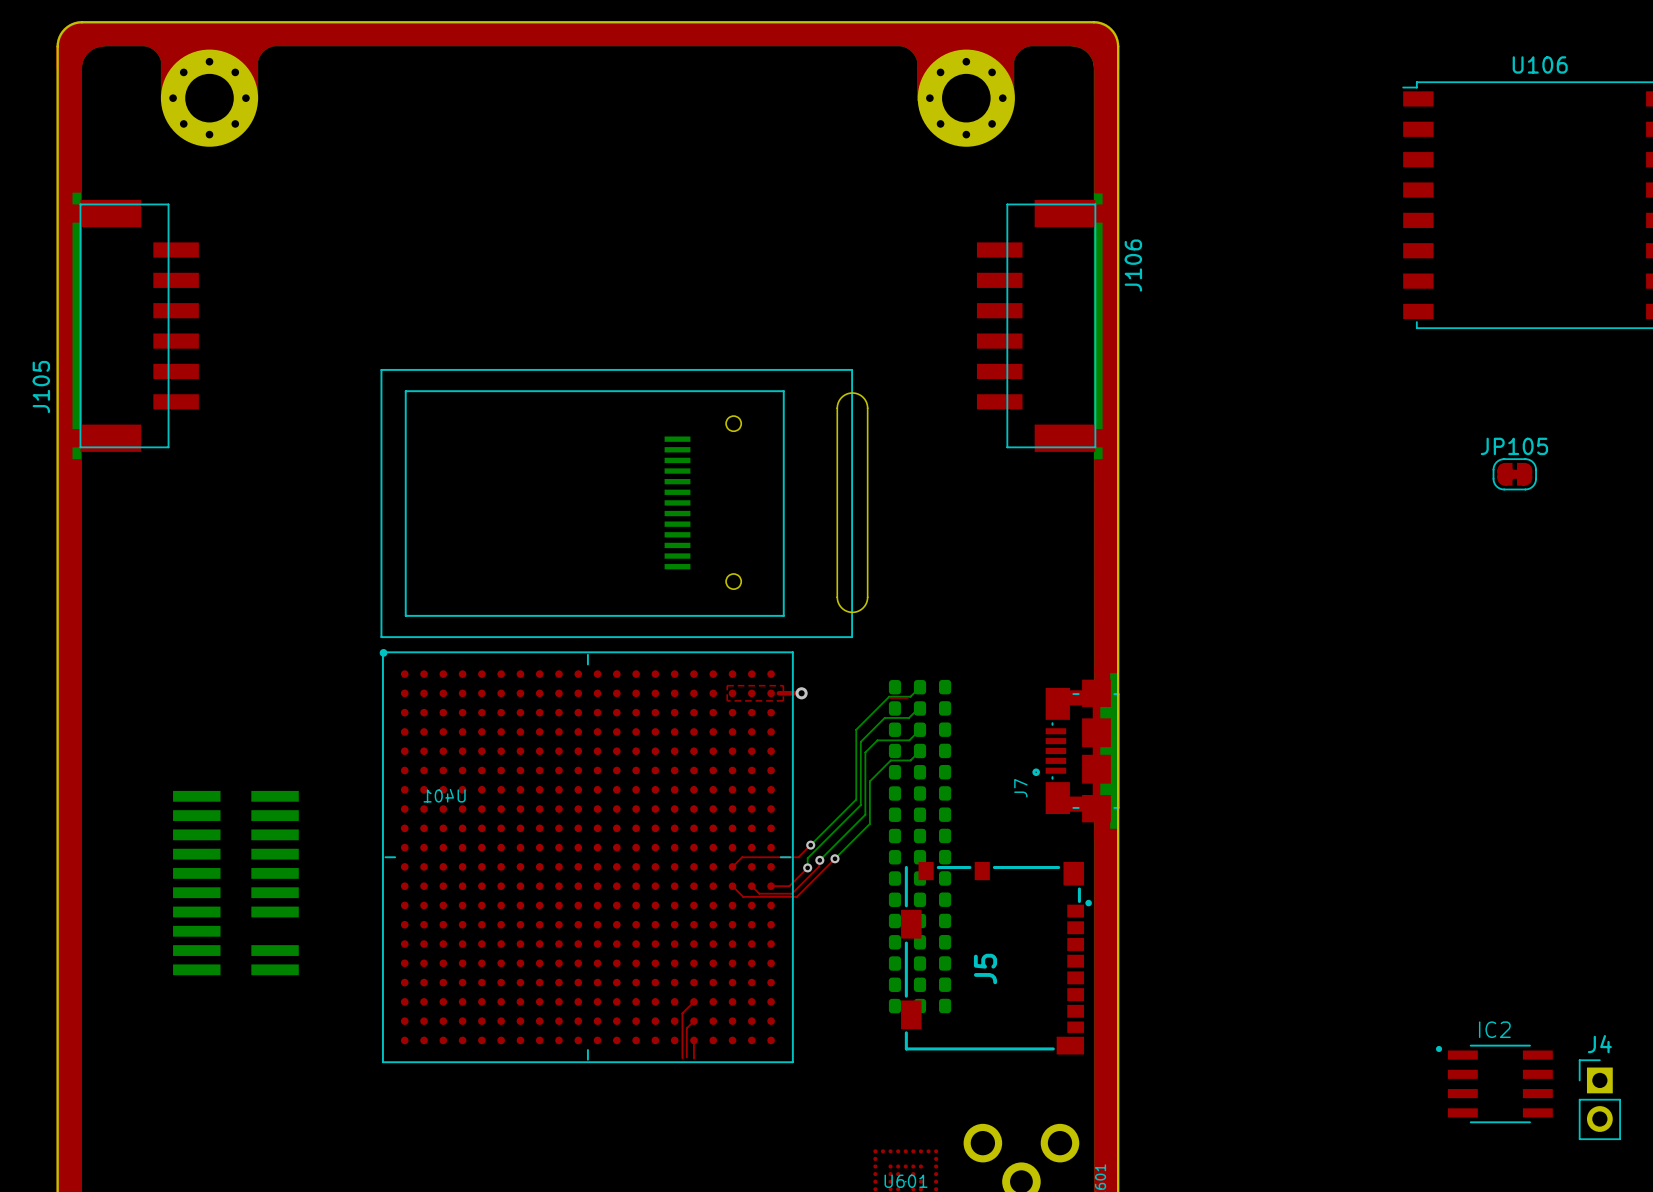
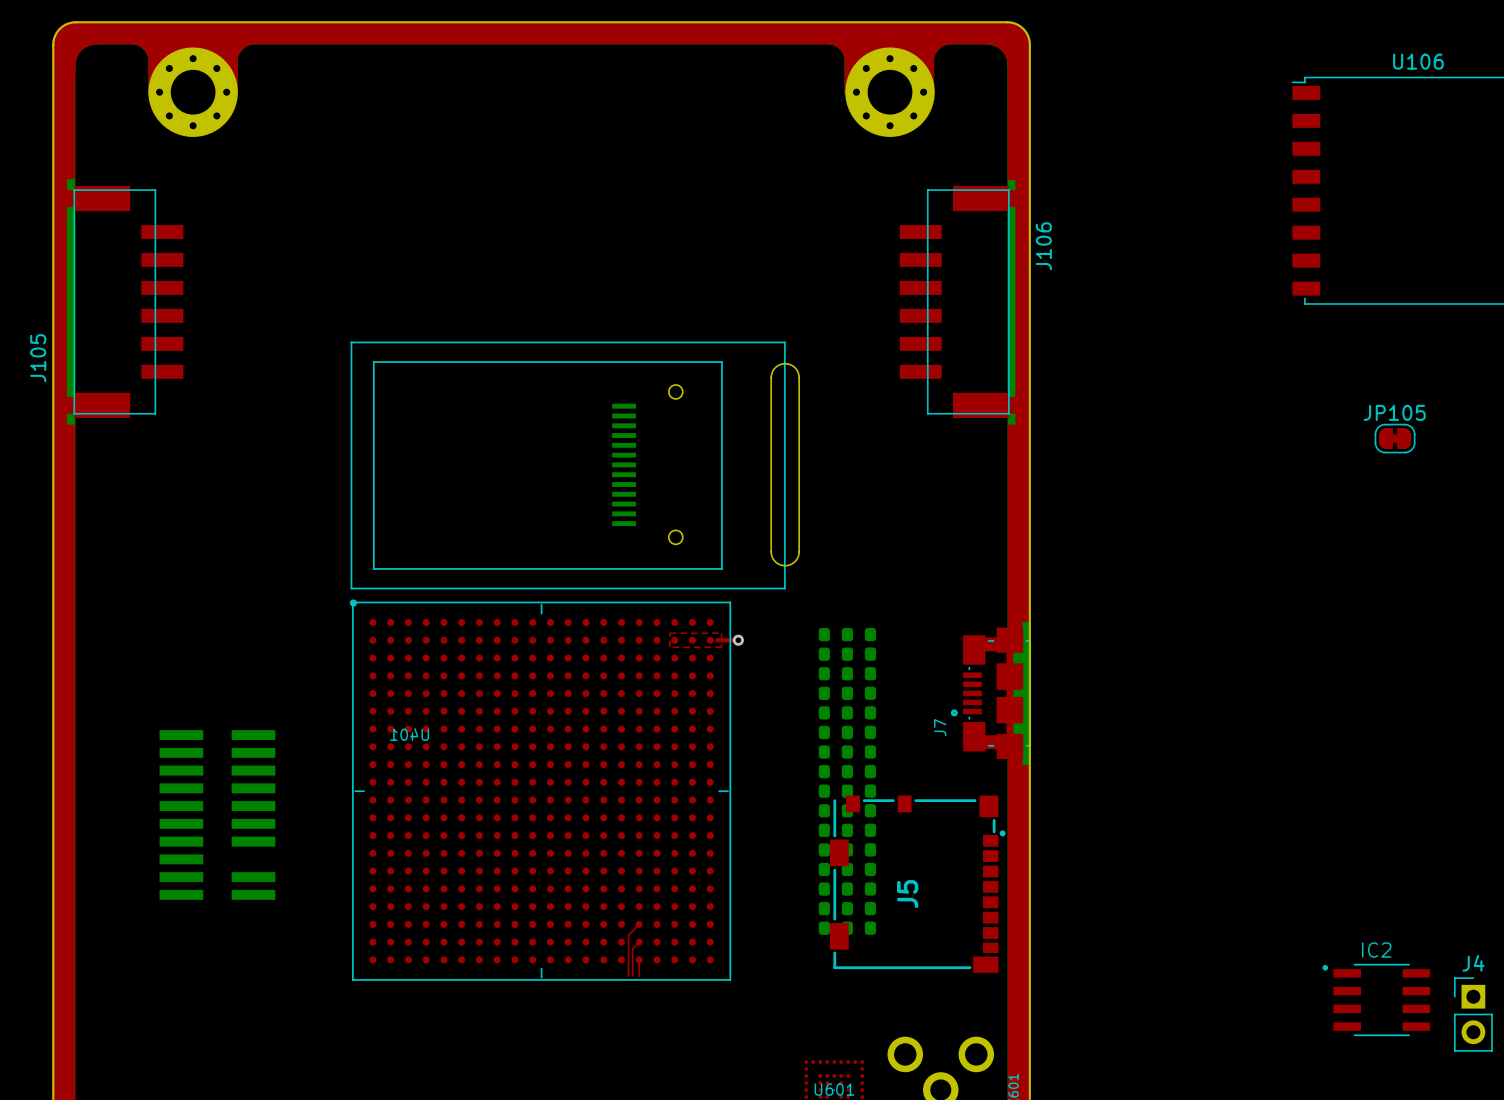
bottom track: (918, 687) (920, 687) (910, 696) (889, 696) (856, 729) (856, 799) (810, 845) -> none
top track: (889, 697) (907, 697) -> none
bottom track: (920, 708) (909, 717) (884, 717) (860, 741) (860, 805) (807, 858) (807, 867) -> none
bottom track: (920, 729) (909, 740) (877, 740) (865, 752) (865, 814) (819, 860) -> none
bottom track: (920, 750) (910, 760) (890, 760) (869, 781) (869, 823) (835, 858) -> none
top track: (810, 845) (798, 857) (742, 857) (732, 866) -> none
via: (810, 845) -> none
top track: (835, 858) (796, 896) (743, 896) (732, 886) -> none
via: (835, 858) -> none
top track: (819, 860) (819, 866) (791, 893) (759, 893) (751, 886) -> none
via: (819, 860) -> none
top track: (807, 867) (789, 886) (771, 886) -> none
via: (807, 867) -> none

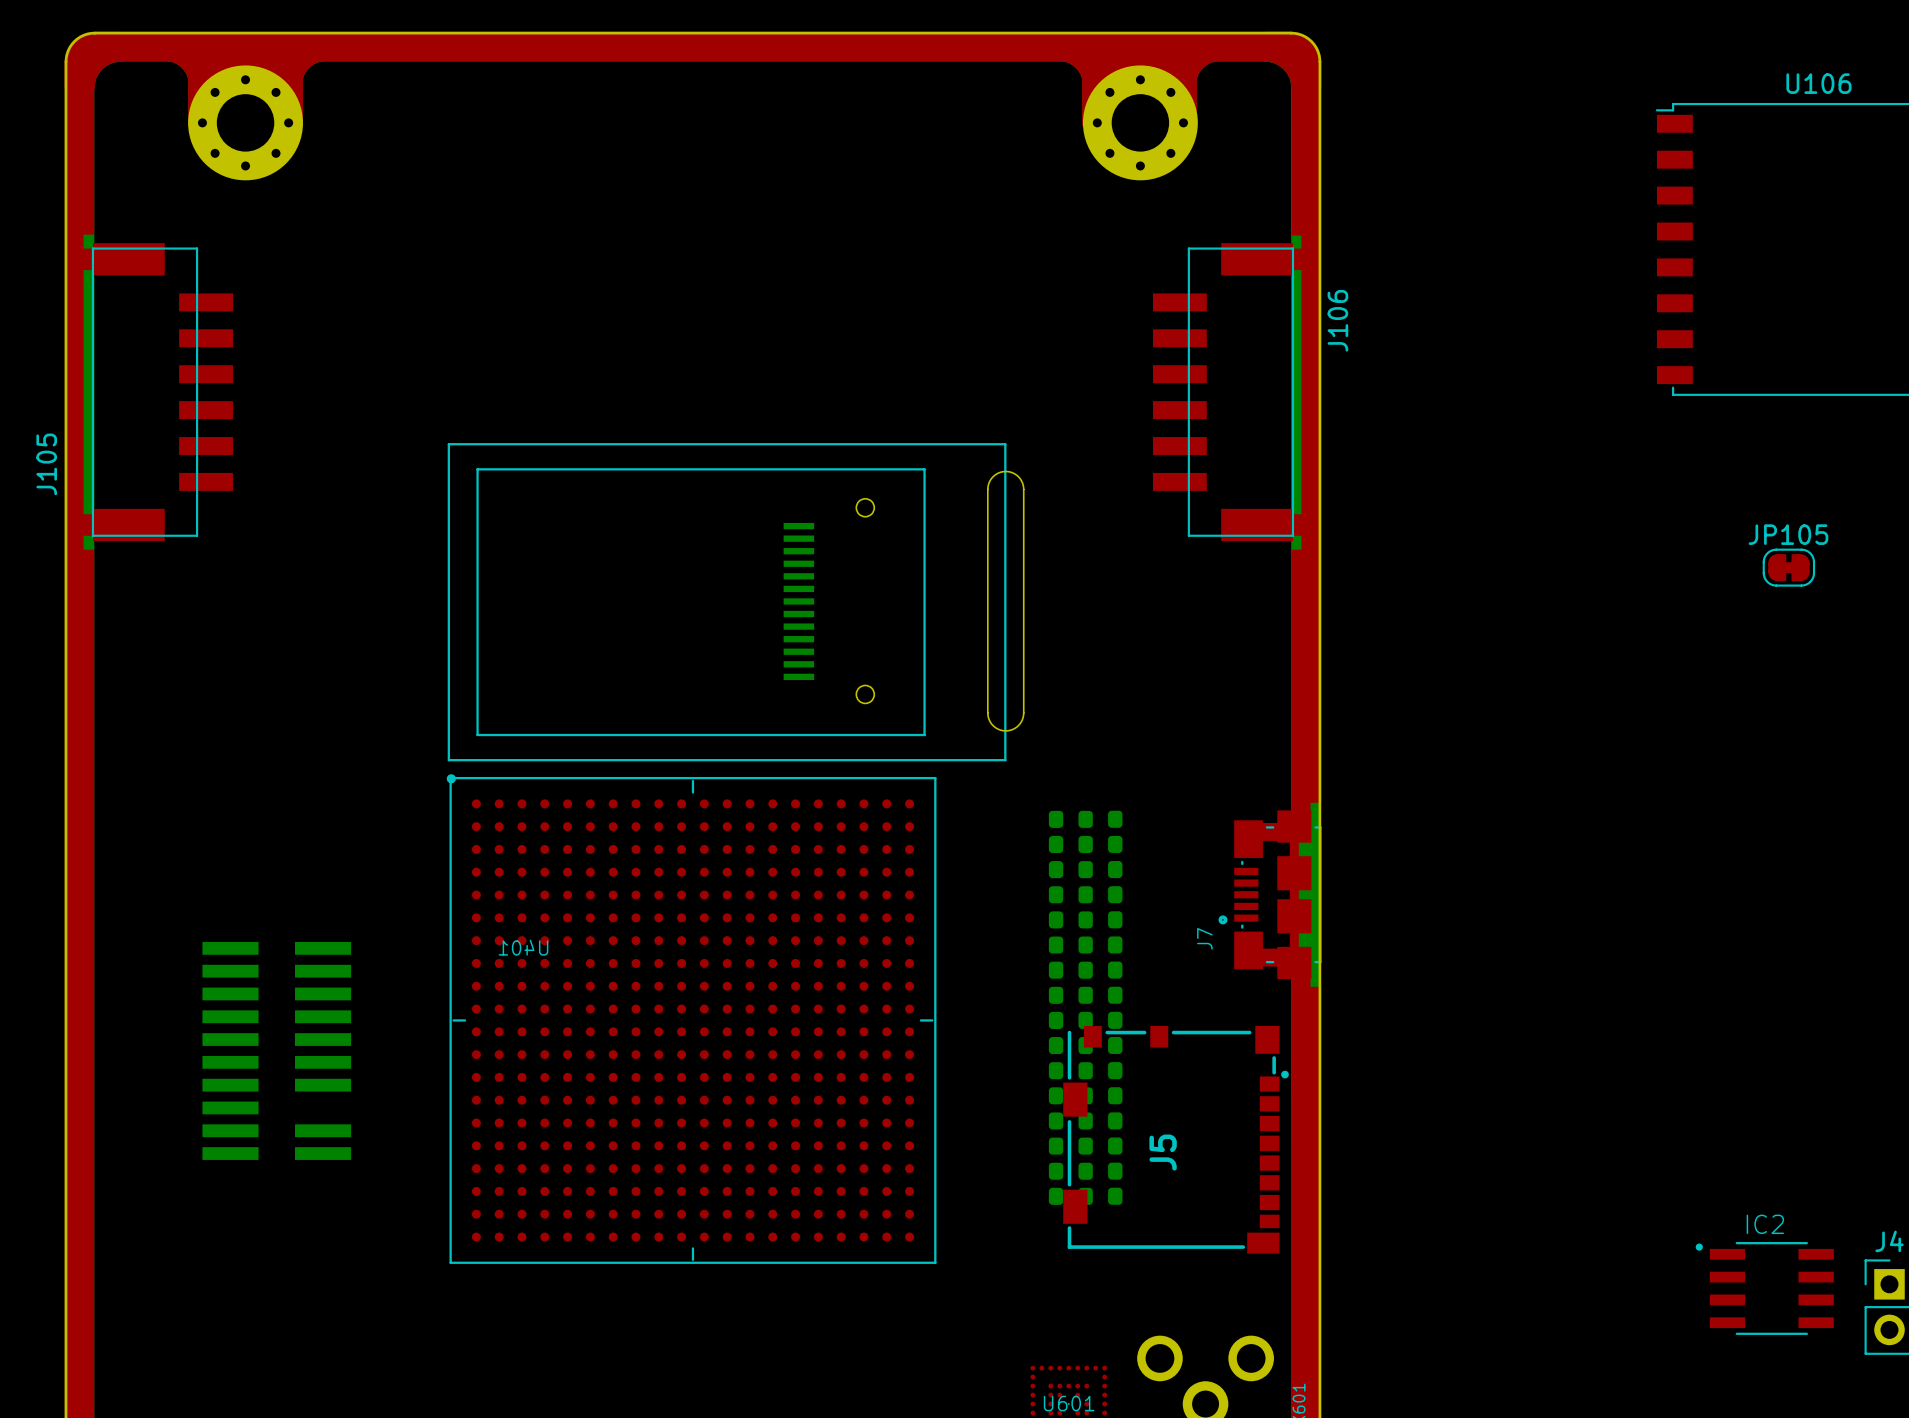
top zone outline: (669, 633) (669, 647) (721, 647) (721, 633) (669, 633) -> none
top track: (717, 640) (738, 640) -> none
via: (738, 640) -> none
top track: (639, 924) (628, 934) (628, 976) -> none
top track: (639, 942) (632, 948) (632, 975) -> none
top track: (639, 959) (639, 976) -> none

